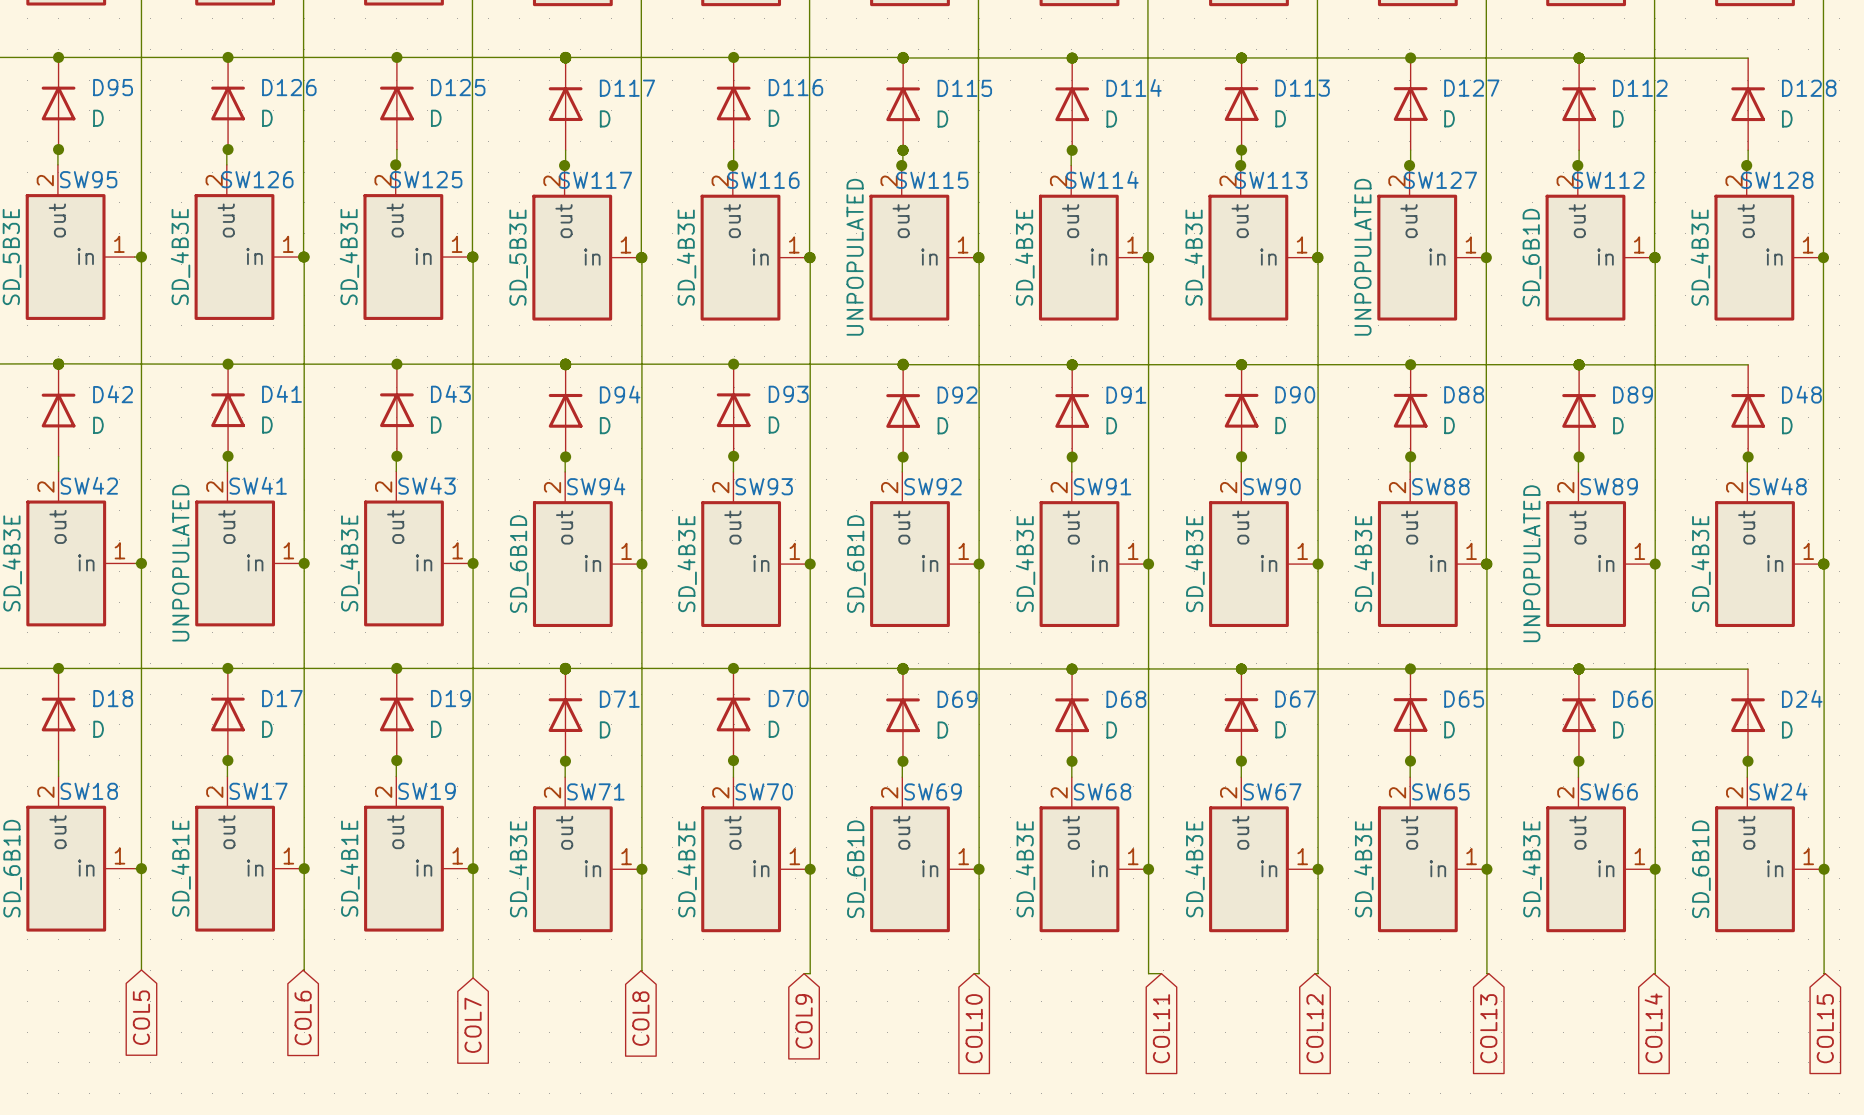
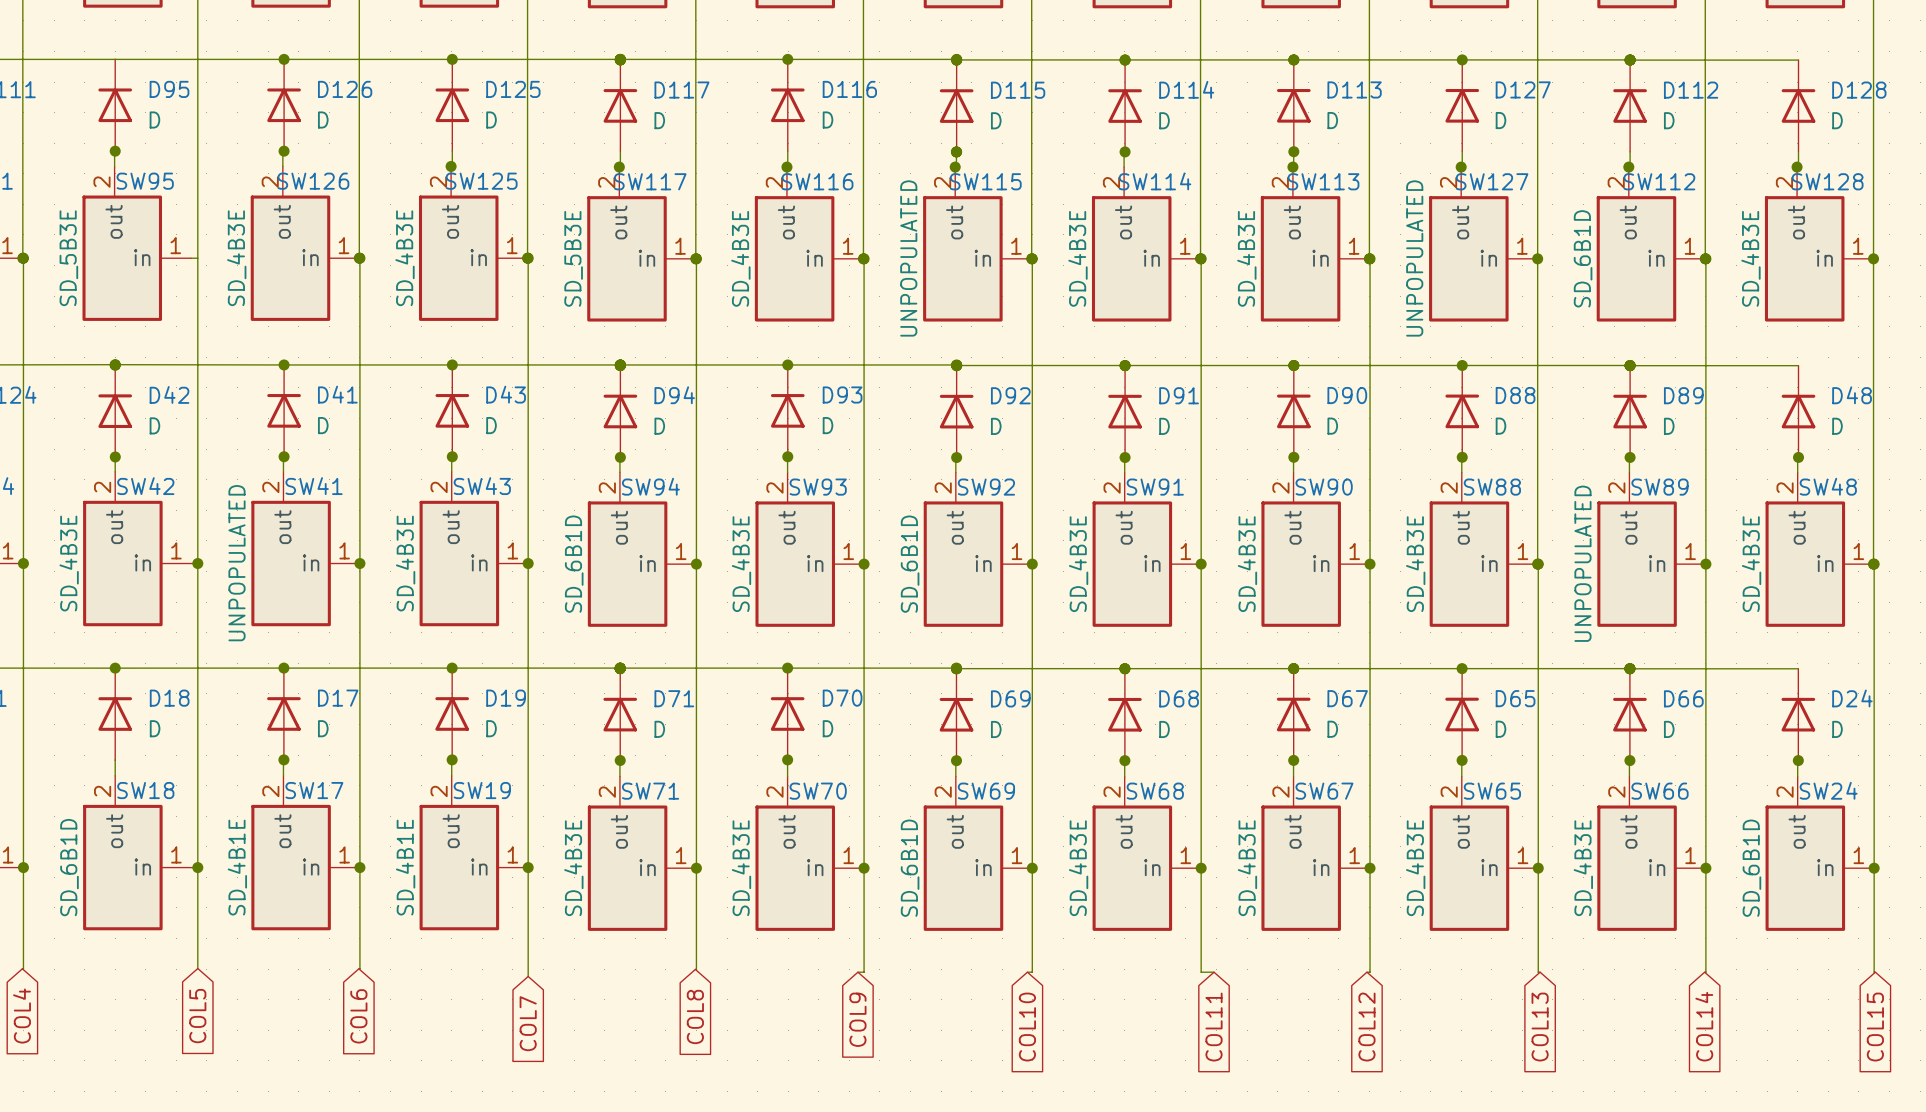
junction: (58, 57) -> none
junction: (141, 257) -> none
junction: none -> (115, 456)

